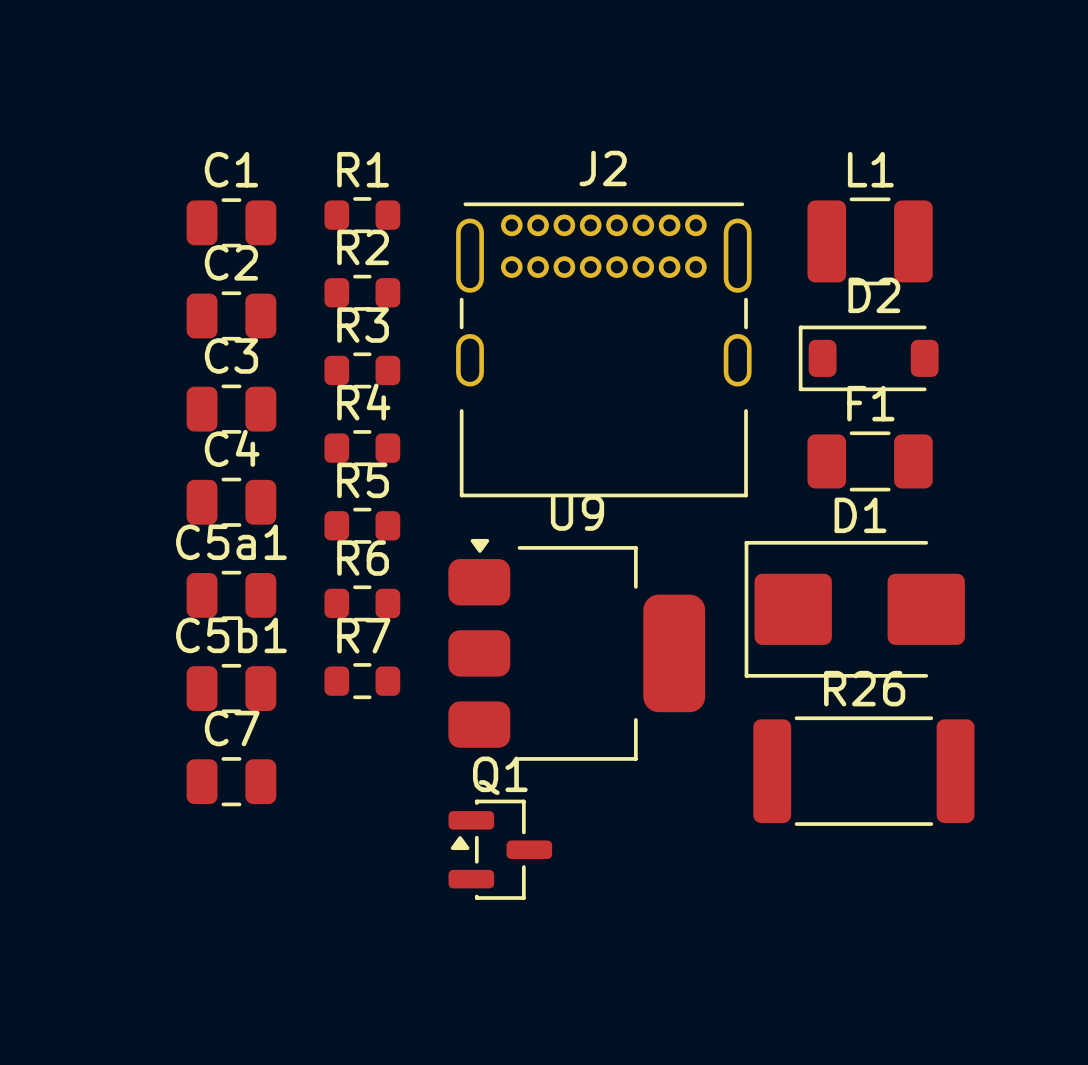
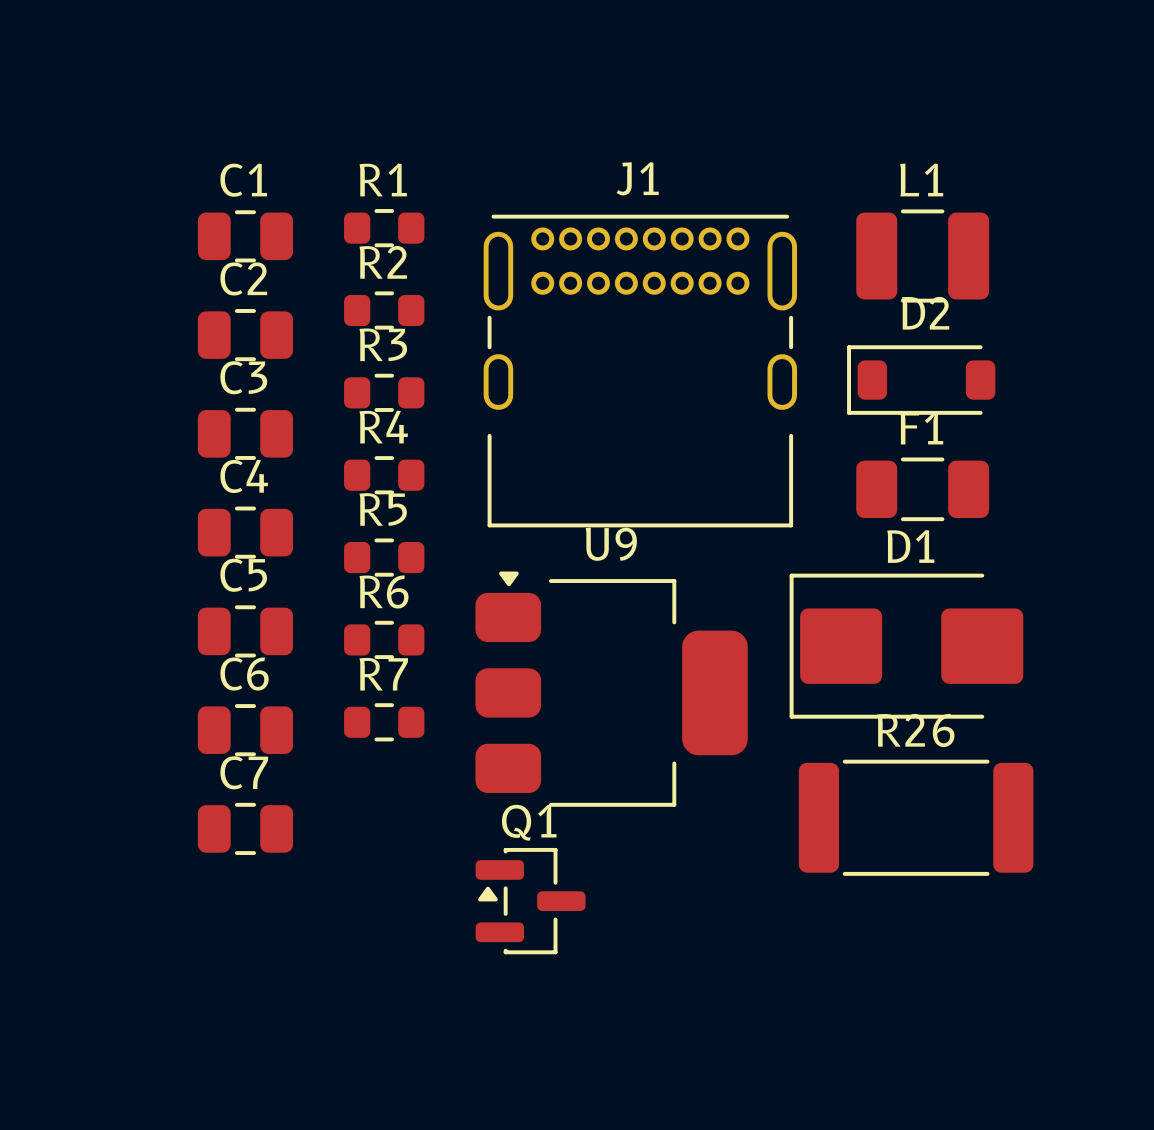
J2 name: J2 (603, 168) -> J1 (637, 178)
C5a1 name: C5a1 (231, 542) -> C5 (243, 575)
C5b1 name: C5b1 (231, 635) -> C6 (244, 674)

